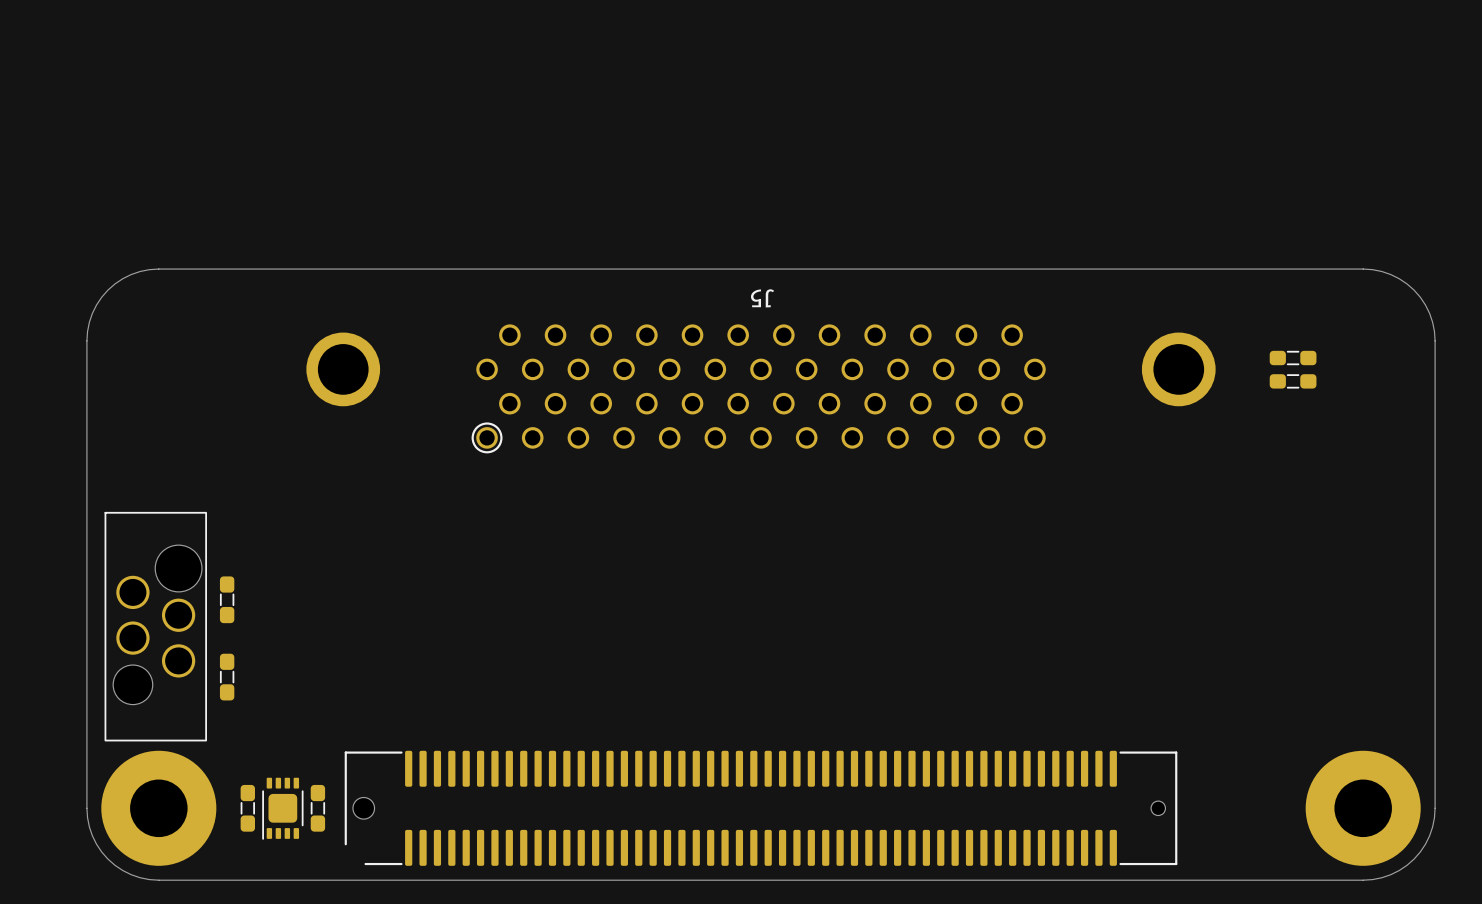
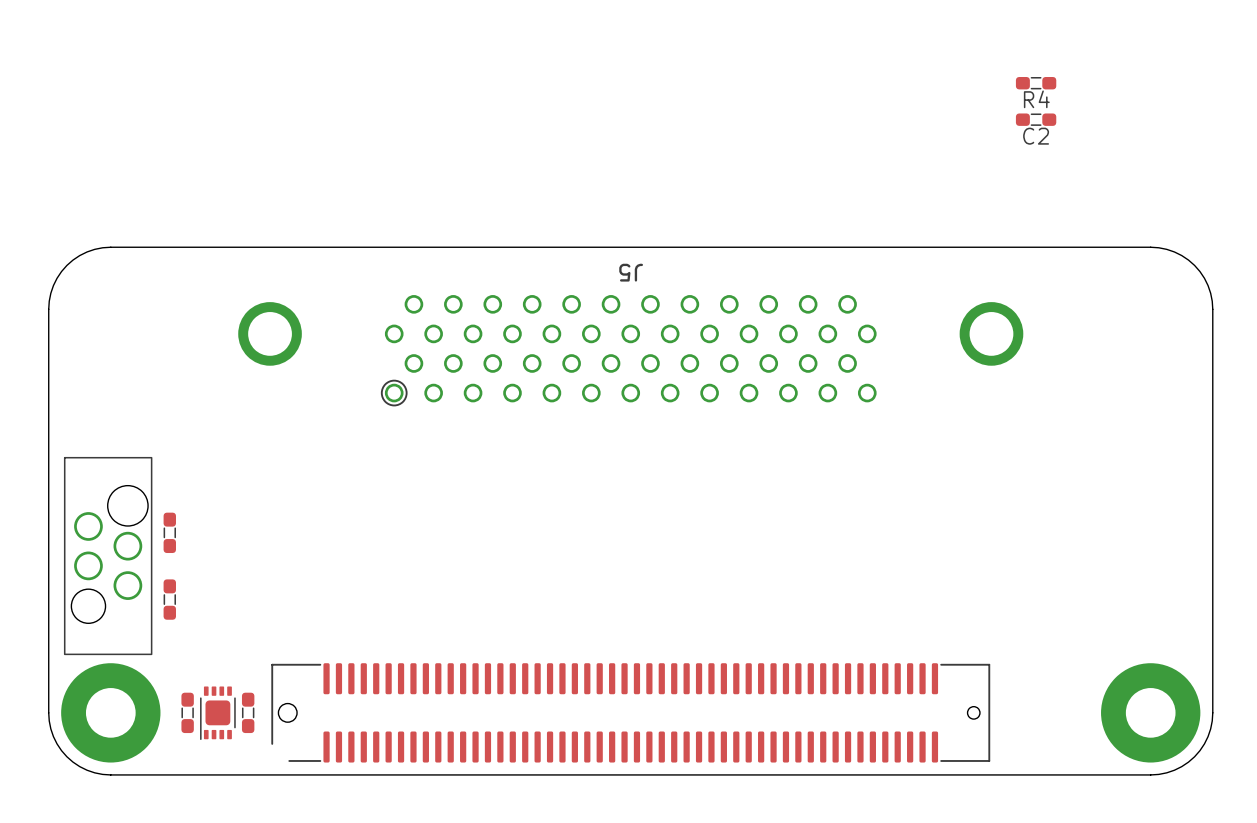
R4: none -> (1036, 83)
C2: none -> (1036, 119)
part: (1293, 358) -> none
part: (1293, 381) -> none

